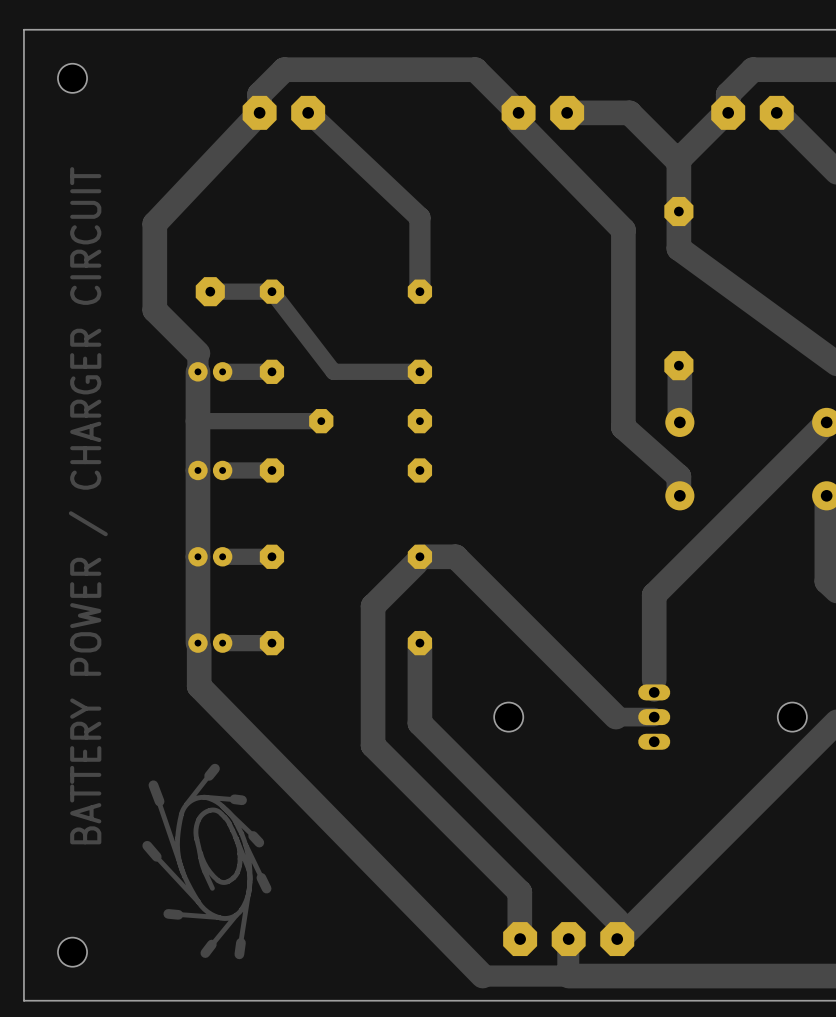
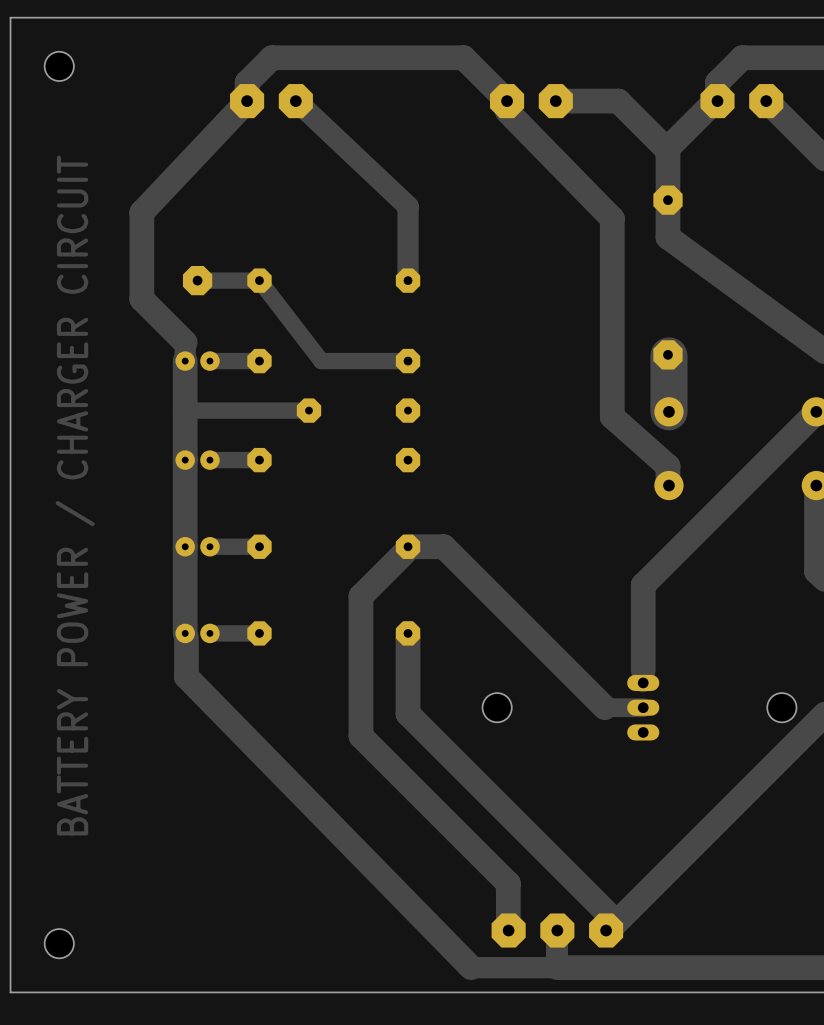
track width: thin (679, 366) (679, 422) -> thick (668, 355) (668, 411)
drawing: [142, 763, 272, 960] -> none

